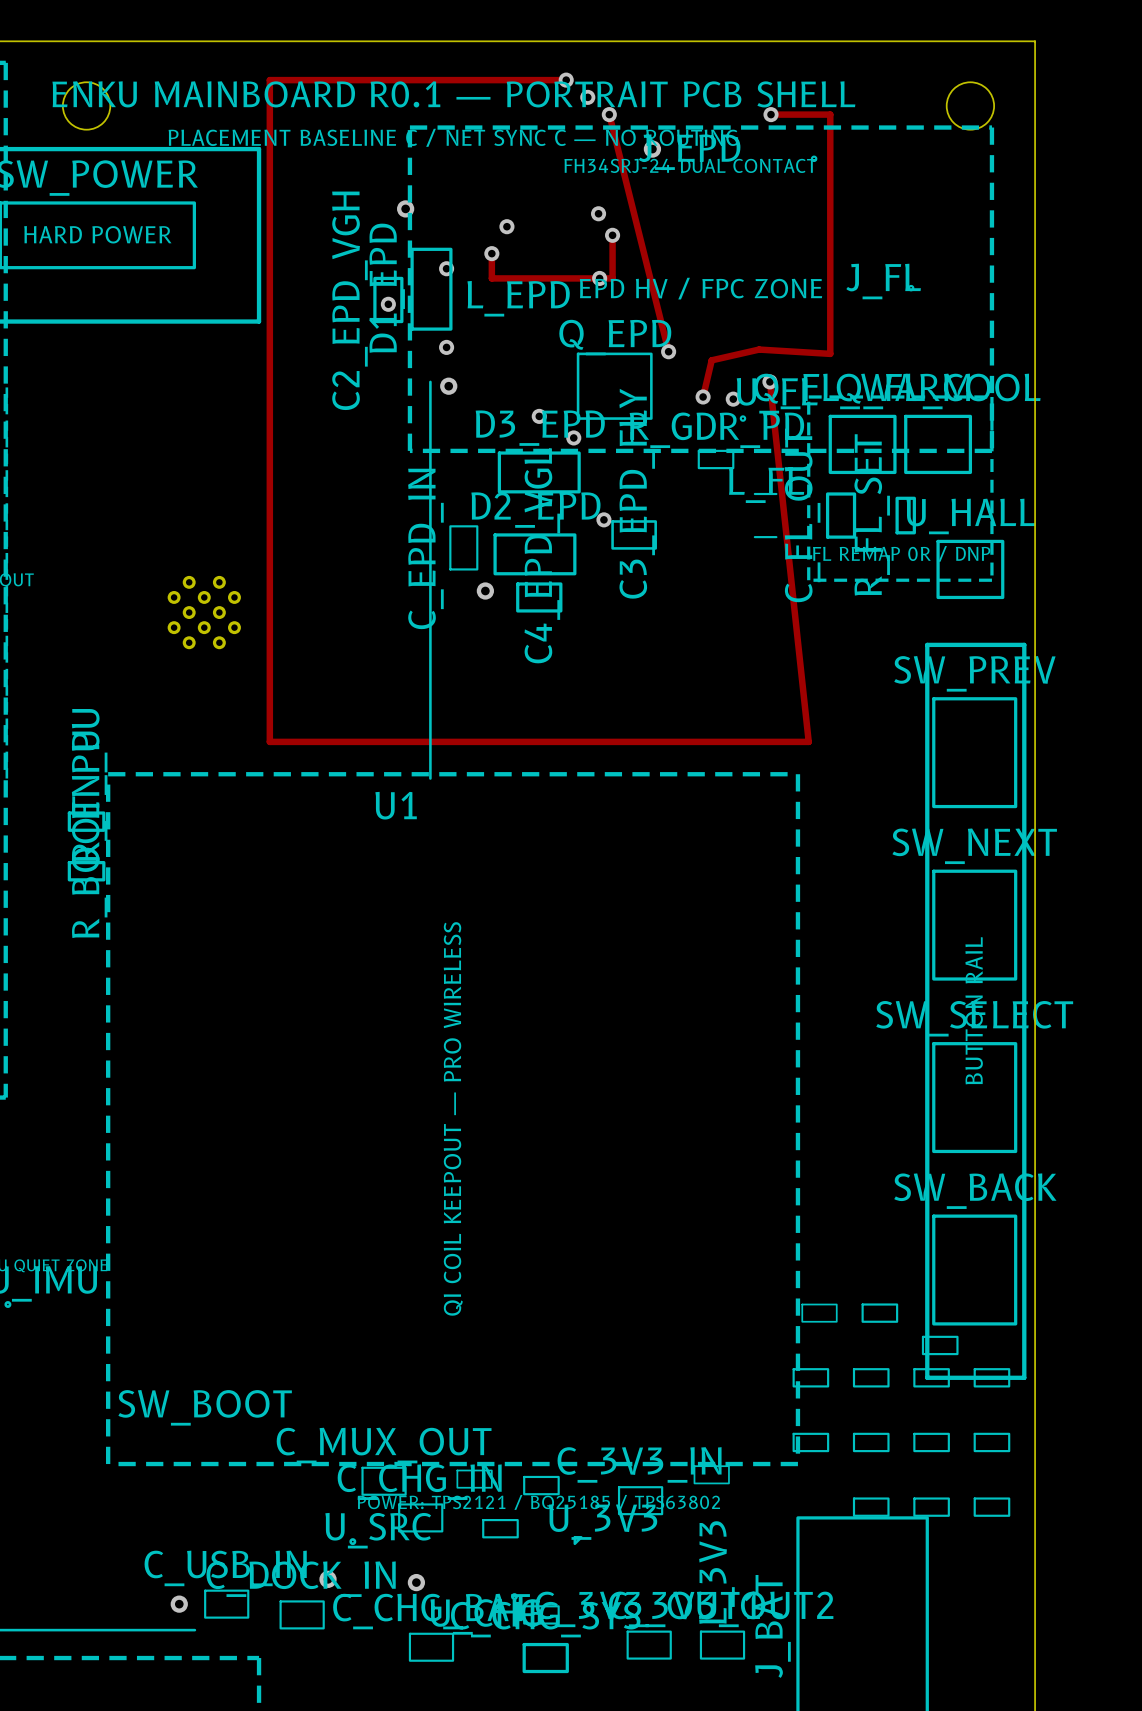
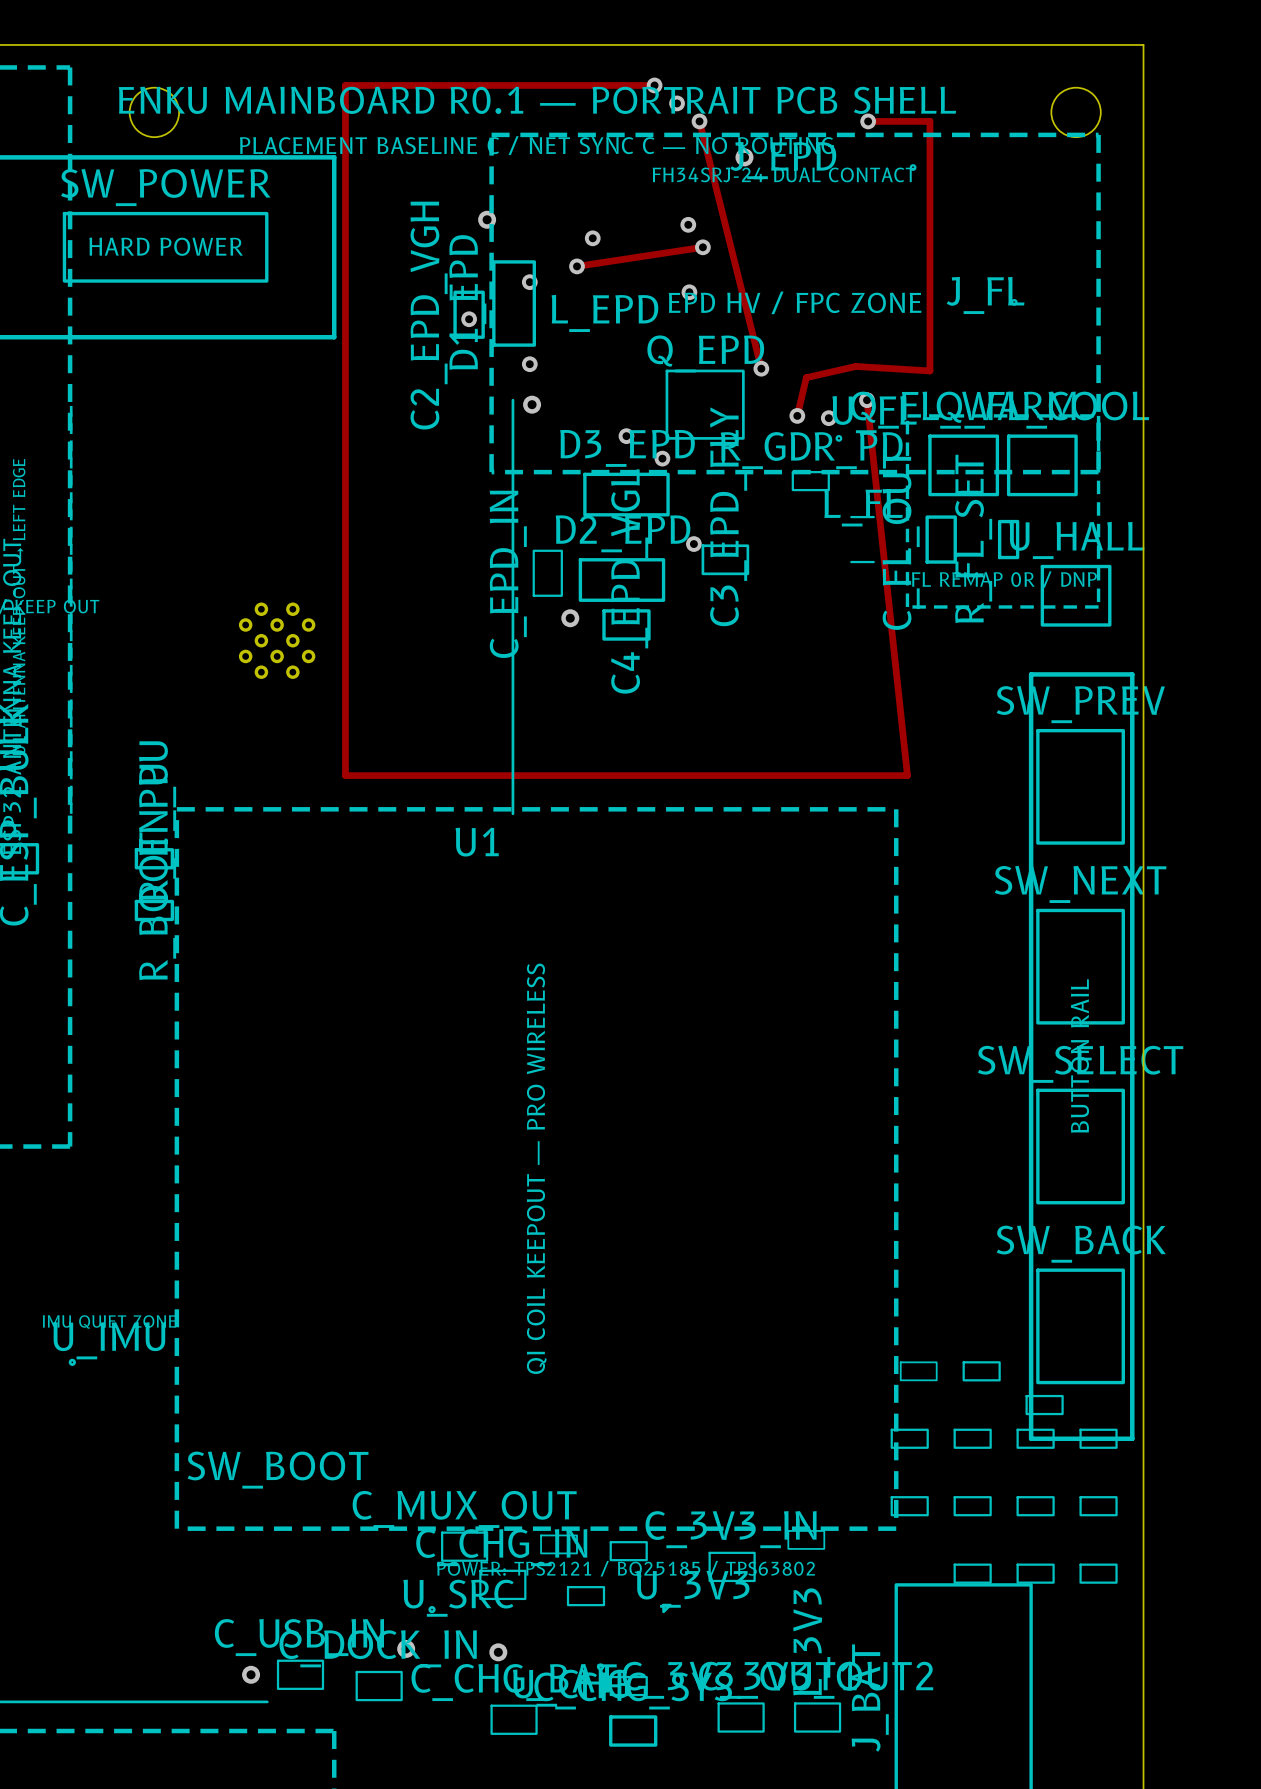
track: (612, 235) (612, 278) (491, 278) (491, 253) -> (702, 247) (577, 266)

